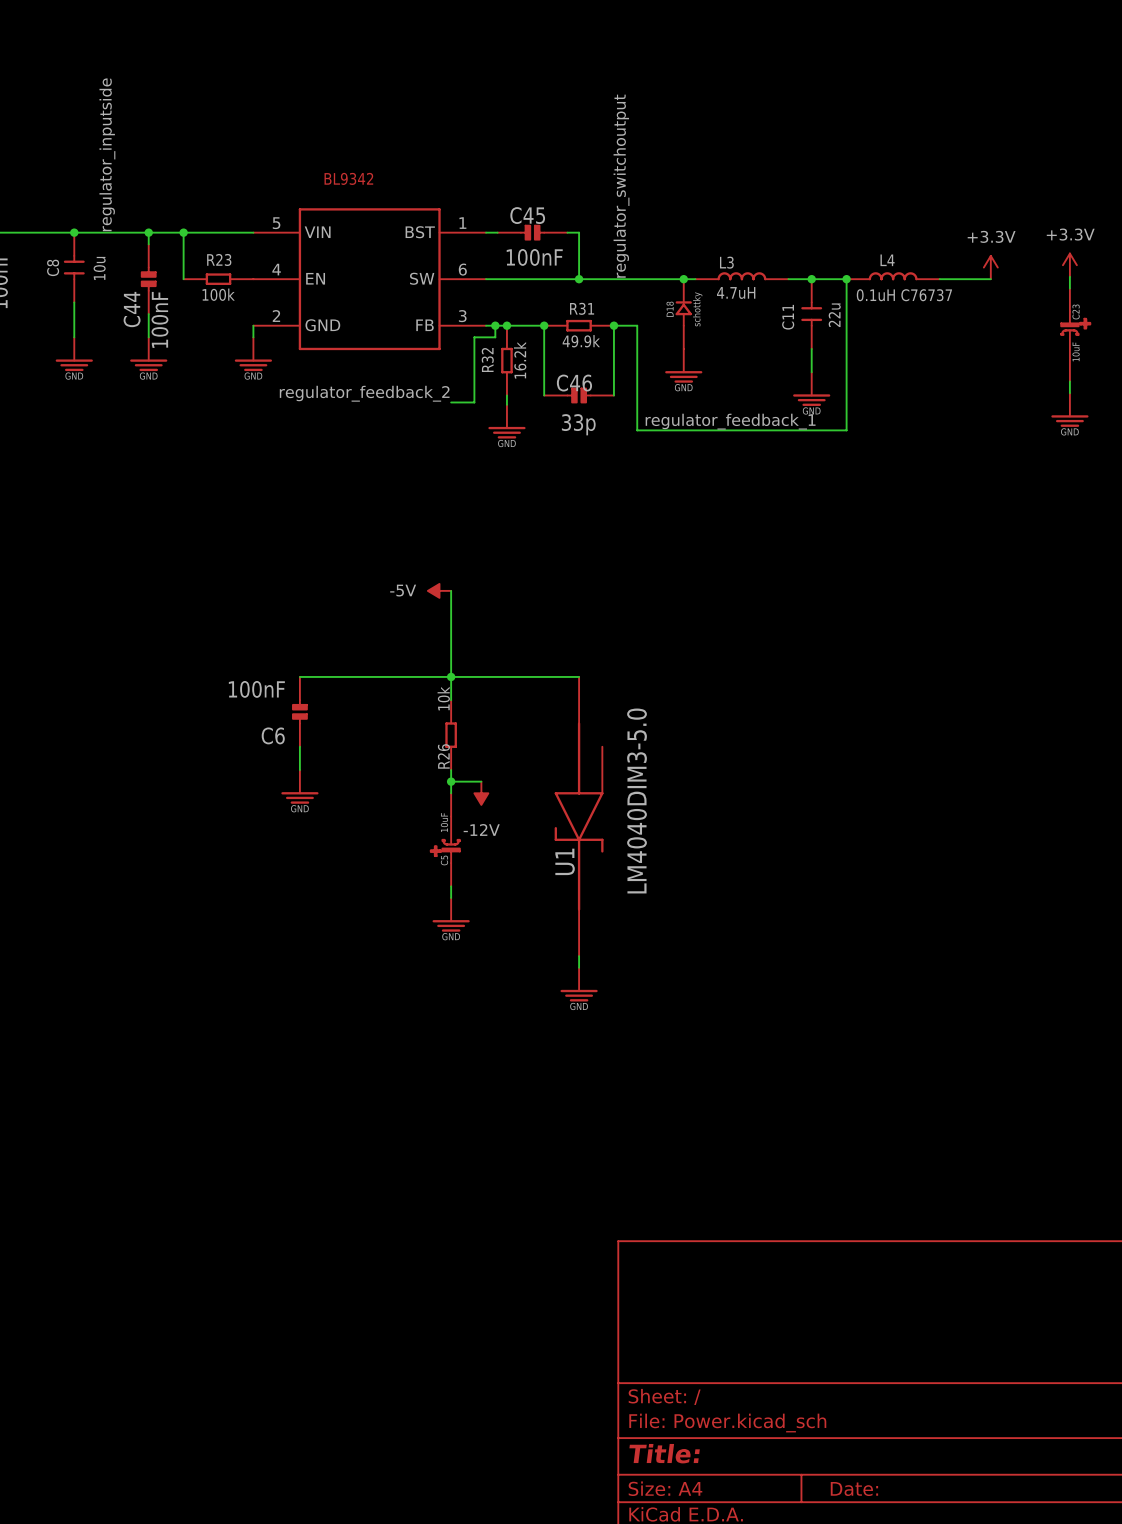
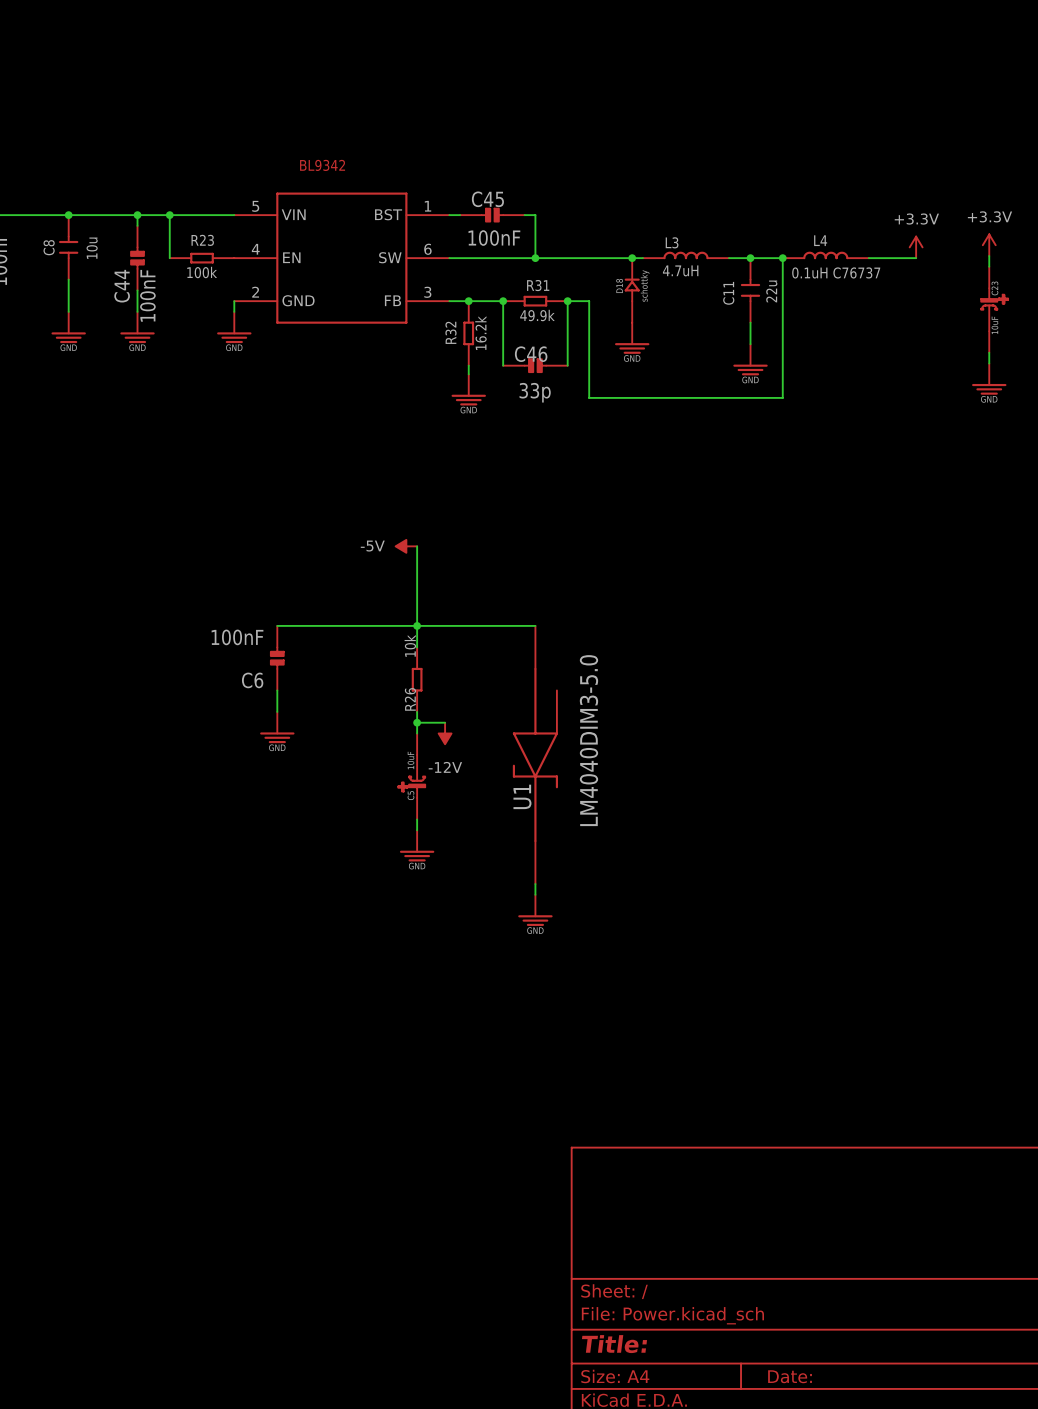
label: regulator_inputside (107, 154) -> none
label: regulator_switchoutput (621, 186) -> none
wire: (495, 325) (495, 337) (474, 337) (474, 402) (451, 402) -> none
junction: (495, 325) -> none
label: regulator_feedback_2 (364, 393) -> none
label: regulator_feedback_1 (730, 421) -> none

